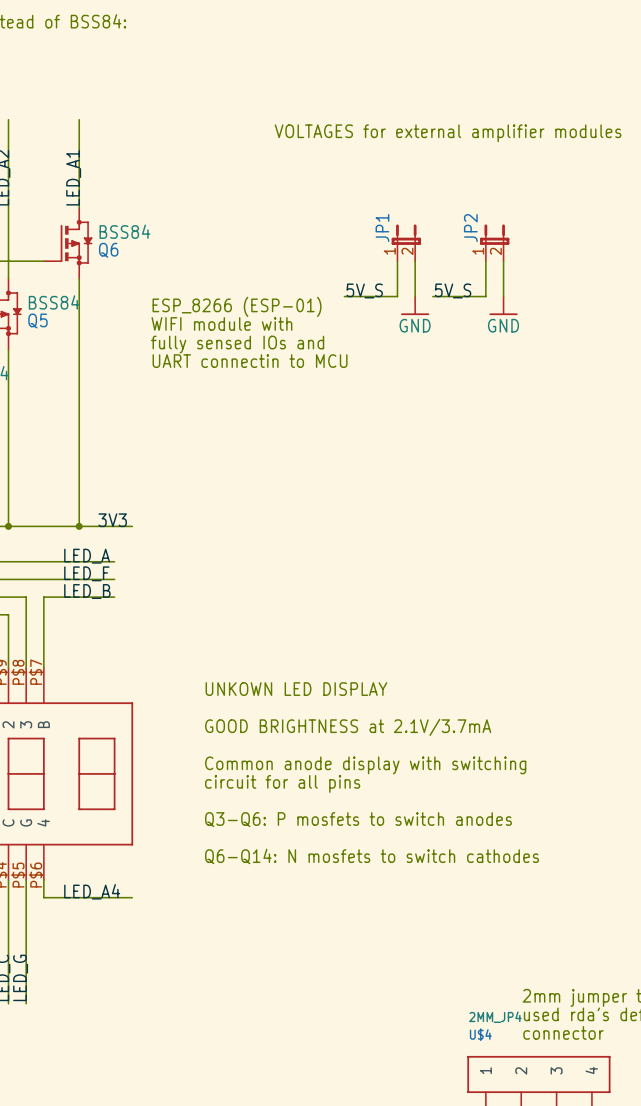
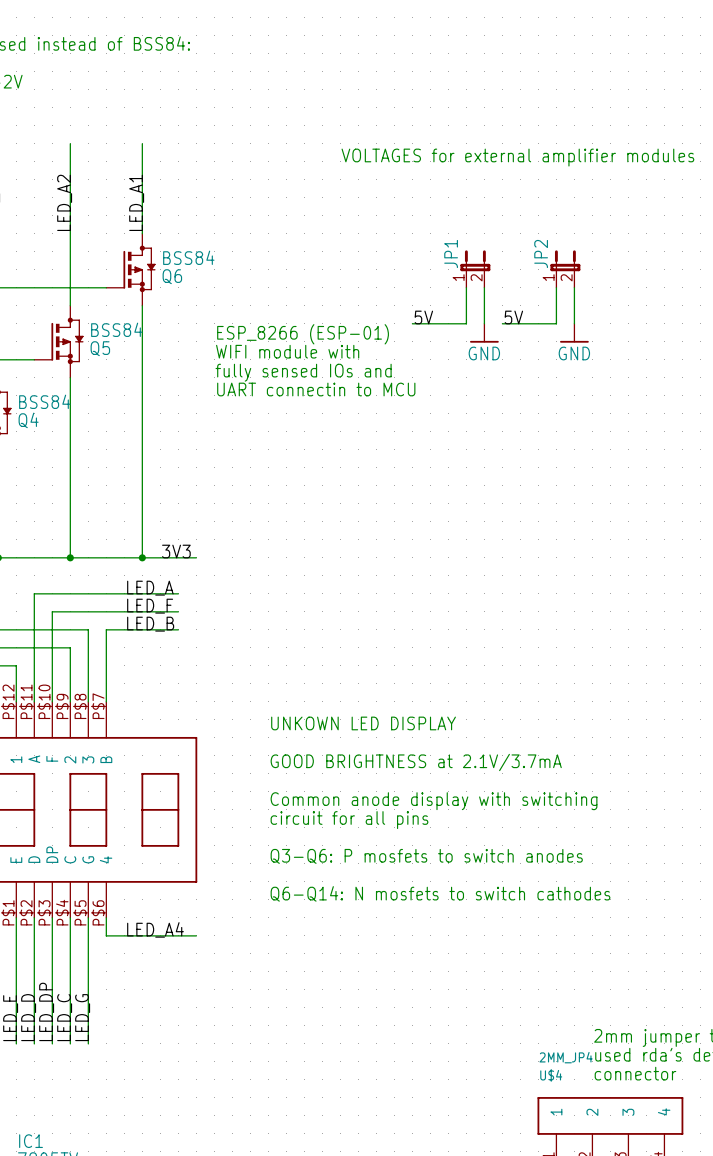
label: 5V_S (364, 290) -> 5V (423, 317)
label: 5V_S (453, 290) -> 5V (513, 317)

